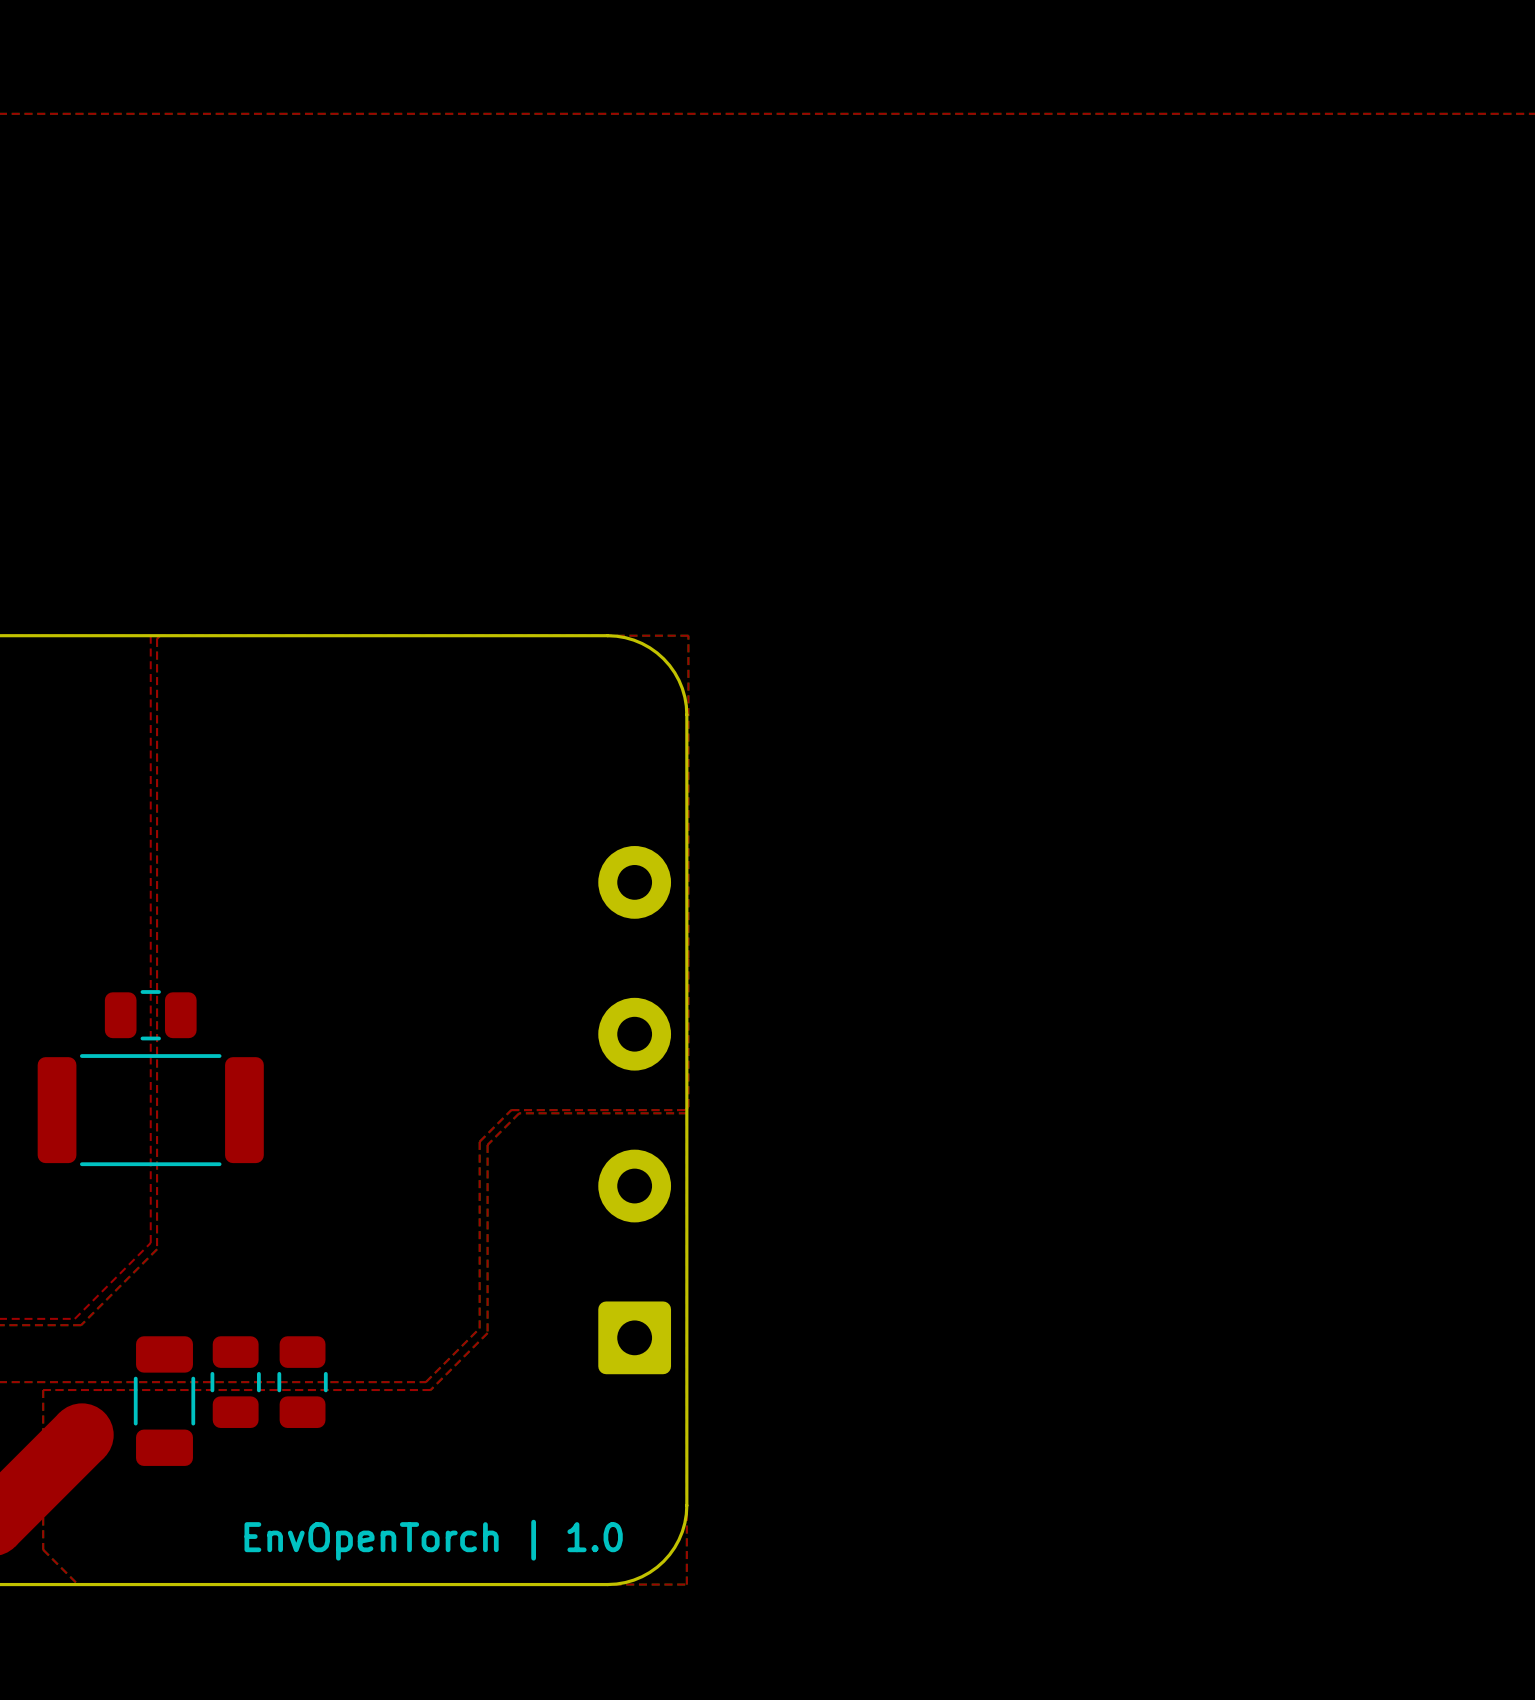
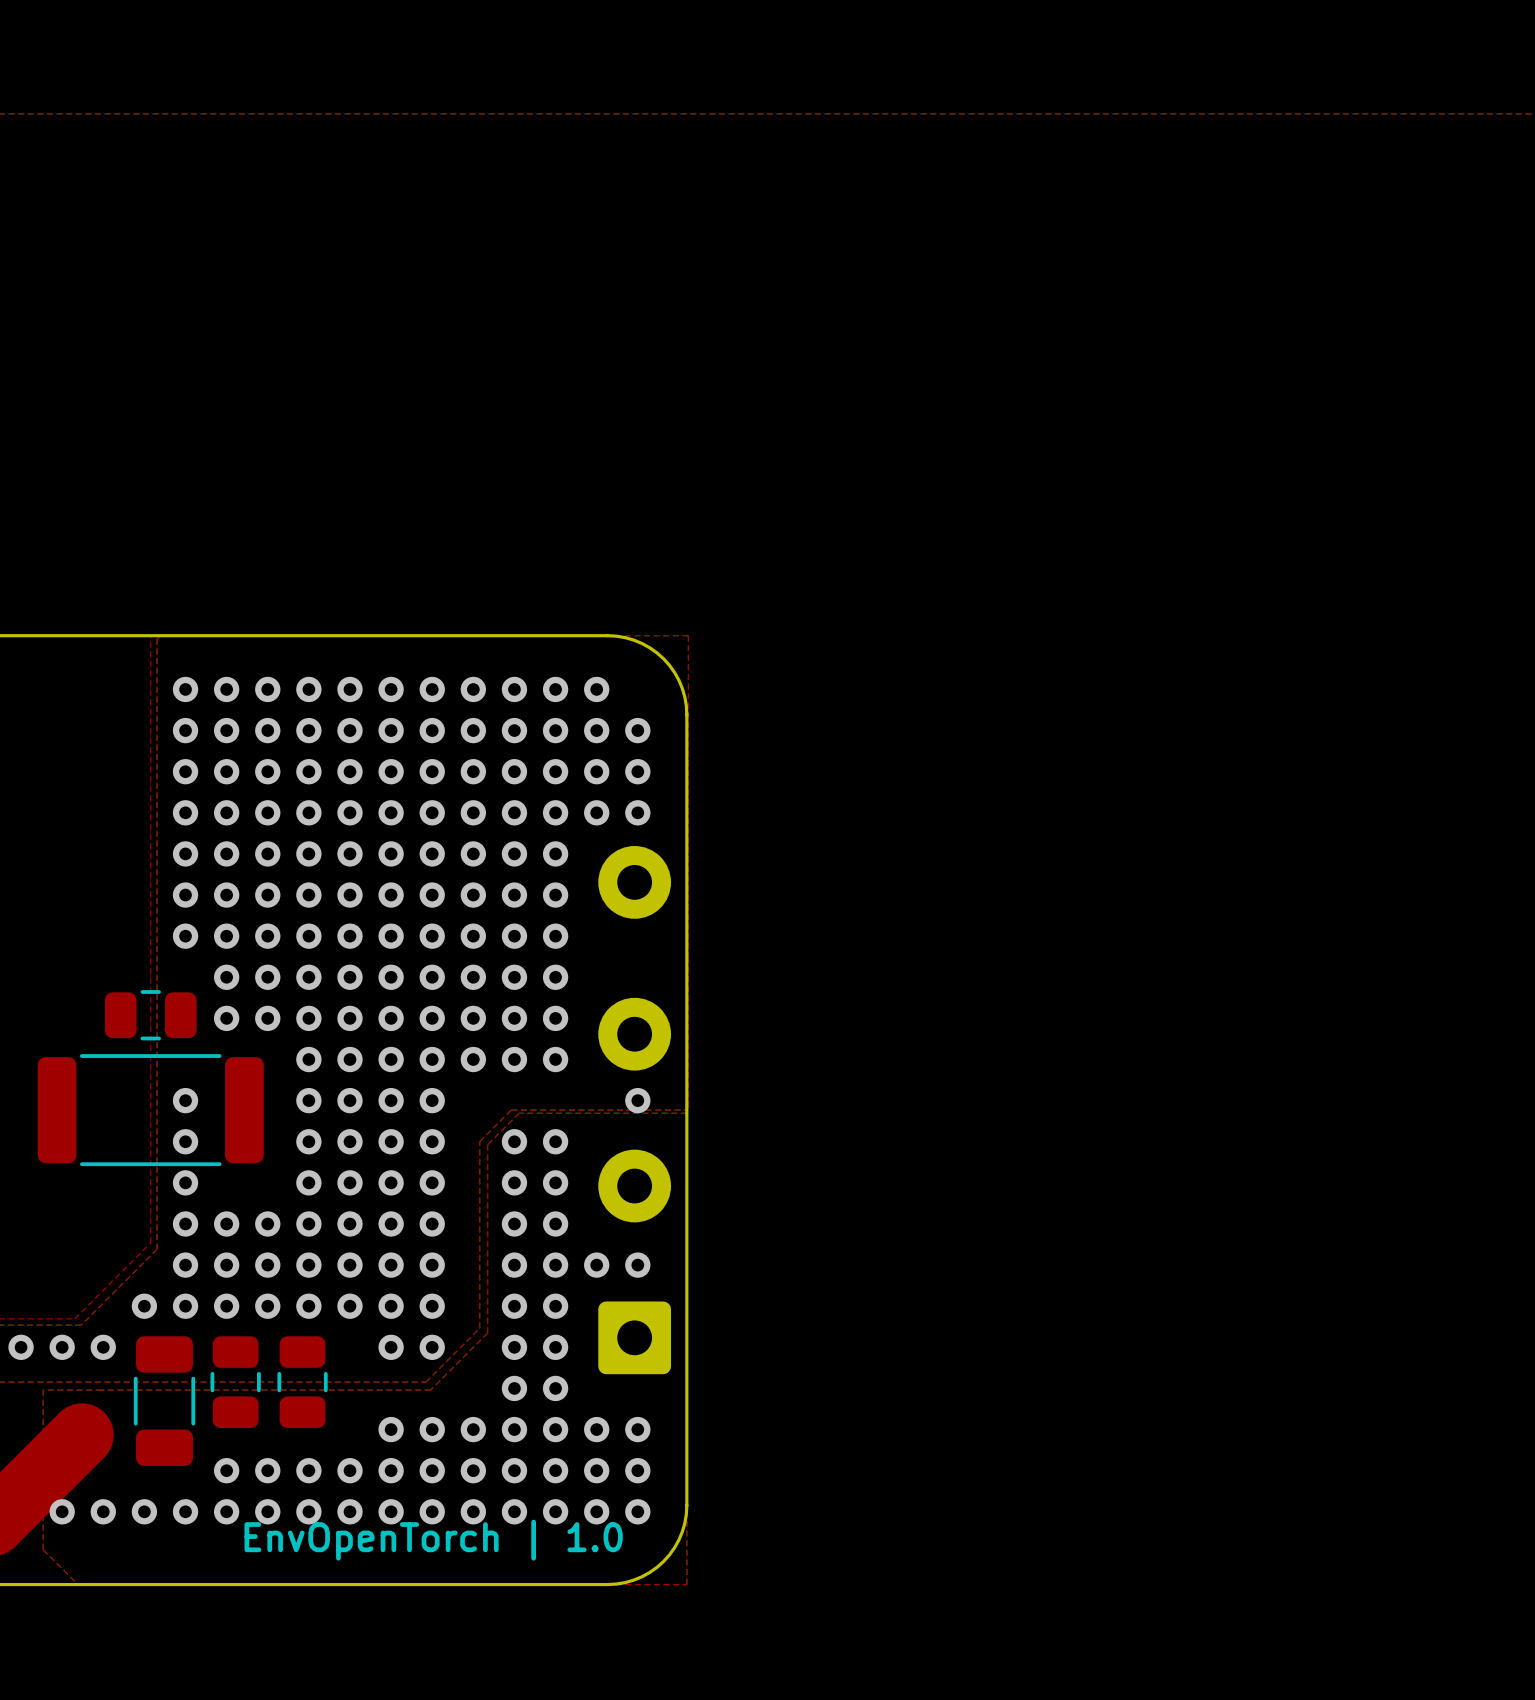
via: none -> (185, 689)
via: none -> (226, 689)
via: none -> (267, 689)
via: none -> (308, 689)
via: none -> (350, 689)
via: none -> (391, 689)
via: none -> (432, 689)
via: none -> (473, 689)
via: none -> (514, 689)
via: none -> (555, 689)
via: none -> (596, 689)
via: none -> (185, 730)
via: none -> (226, 730)
via: none -> (267, 730)
via: none -> (308, 730)
via: none -> (350, 730)
via: none -> (391, 730)
via: none -> (432, 730)
via: none -> (473, 730)
via: none -> (514, 730)
via: none -> (555, 730)
via: none -> (596, 730)
via: none -> (637, 730)
via: none -> (185, 771)
via: none -> (226, 771)
via: none -> (267, 771)
via: none -> (308, 771)
via: none -> (350, 771)
via: none -> (391, 771)
via: none -> (432, 771)
via: none -> (473, 771)
via: none -> (514, 771)
via: none -> (555, 771)
via: none -> (596, 771)
via: none -> (637, 771)
via: none -> (185, 812)
via: none -> (226, 812)
via: none -> (267, 812)
via: none -> (308, 812)
via: none -> (350, 812)
via: none -> (391, 812)
via: none -> (432, 812)
via: none -> (473, 812)
via: none -> (514, 812)
via: none -> (555, 812)
via: none -> (596, 812)
via: none -> (637, 812)
via: none -> (185, 853)
via: none -> (226, 853)
via: none -> (267, 853)
via: none -> (308, 853)
via: none -> (350, 853)
via: none -> (391, 853)
via: none -> (432, 853)
via: none -> (473, 853)
via: none -> (514, 853)
via: none -> (555, 853)
via: none -> (185, 895)
via: none -> (226, 895)
via: none -> (267, 895)
via: none -> (308, 895)
via: none -> (350, 895)
via: none -> (391, 895)
via: none -> (432, 895)
via: none -> (473, 895)
via: none -> (514, 895)
via: none -> (555, 895)
via: none -> (185, 936)
via: none -> (226, 936)
via: none -> (267, 936)
via: none -> (308, 936)
via: none -> (350, 936)
via: none -> (391, 936)
via: none -> (432, 936)
via: none -> (473, 936)
via: none -> (514, 936)
via: none -> (555, 936)
via: none -> (226, 977)
via: none -> (267, 977)
via: none -> (308, 977)
via: none -> (350, 977)
via: none -> (391, 977)
via: none -> (432, 977)
via: none -> (473, 977)
via: none -> (514, 977)
via: none -> (555, 977)
via: none -> (226, 1018)
via: none -> (267, 1018)
via: none -> (308, 1018)
via: none -> (350, 1018)
via: none -> (391, 1018)
via: none -> (432, 1018)
via: none -> (473, 1018)
via: none -> (514, 1018)
via: none -> (555, 1018)
via: none -> (308, 1059)
via: none -> (350, 1059)
via: none -> (391, 1059)
via: none -> (432, 1059)
via: none -> (473, 1059)
via: none -> (514, 1059)
via: none -> (555, 1059)
via: none -> (185, 1100)
via: none -> (308, 1100)
via: none -> (350, 1100)
via: none -> (391, 1100)
via: none -> (432, 1100)
via: none -> (637, 1100)
via: none -> (185, 1141)
via: none -> (308, 1141)
via: none -> (350, 1141)
via: none -> (391, 1141)
via: none -> (432, 1141)
via: none -> (514, 1141)
via: none -> (555, 1141)
via: none -> (185, 1182)
via: none -> (308, 1182)
via: none -> (350, 1182)
via: none -> (391, 1182)
via: none -> (432, 1182)
via: none -> (514, 1182)
via: none -> (555, 1182)
via: none -> (185, 1223)
via: none -> (226, 1223)
via: none -> (267, 1223)
via: none -> (308, 1223)
via: none -> (350, 1223)
via: none -> (391, 1223)
via: none -> (432, 1223)
via: none -> (514, 1223)
via: none -> (555, 1223)
via: none -> (185, 1265)
via: none -> (226, 1265)
via: none -> (267, 1265)
via: none -> (308, 1265)
via: none -> (350, 1265)
via: none -> (391, 1265)
via: none -> (432, 1265)
via: none -> (514, 1265)
via: none -> (555, 1265)
via: none -> (596, 1265)
via: none -> (637, 1265)
via: none -> (144, 1306)
via: none -> (185, 1306)
via: none -> (226, 1306)
via: none -> (267, 1306)
via: none -> (308, 1306)
via: none -> (350, 1306)
via: none -> (391, 1306)
via: none -> (432, 1306)
via: none -> (514, 1306)
via: none -> (555, 1306)
via: none -> (21, 1347)
via: none -> (62, 1347)
via: none -> (103, 1347)
via: none -> (391, 1347)
via: none -> (432, 1347)
via: none -> (514, 1347)
via: none -> (555, 1347)
via: none -> (514, 1388)
via: none -> (555, 1388)
via: none -> (391, 1429)
via: none -> (432, 1429)
via: none -> (473, 1429)
via: none -> (514, 1429)
via: none -> (555, 1429)
via: none -> (596, 1429)
via: none -> (637, 1429)
via: none -> (226, 1470)
via: none -> (267, 1470)
via: none -> (308, 1470)
via: none -> (350, 1470)
via: none -> (391, 1470)
via: none -> (432, 1470)
via: none -> (473, 1470)
via: none -> (514, 1470)
via: none -> (555, 1470)
via: none -> (596, 1470)
via: none -> (637, 1470)
via: none -> (62, 1511)
via: none -> (103, 1511)
via: none -> (144, 1511)
via: none -> (185, 1511)
via: none -> (226, 1511)
via: none -> (267, 1511)
via: none -> (308, 1511)
via: none -> (350, 1511)
via: none -> (391, 1511)
via: none -> (432, 1511)
via: none -> (473, 1511)
via: none -> (514, 1511)
via: none -> (555, 1511)
via: none -> (596, 1511)
via: none -> (637, 1511)

